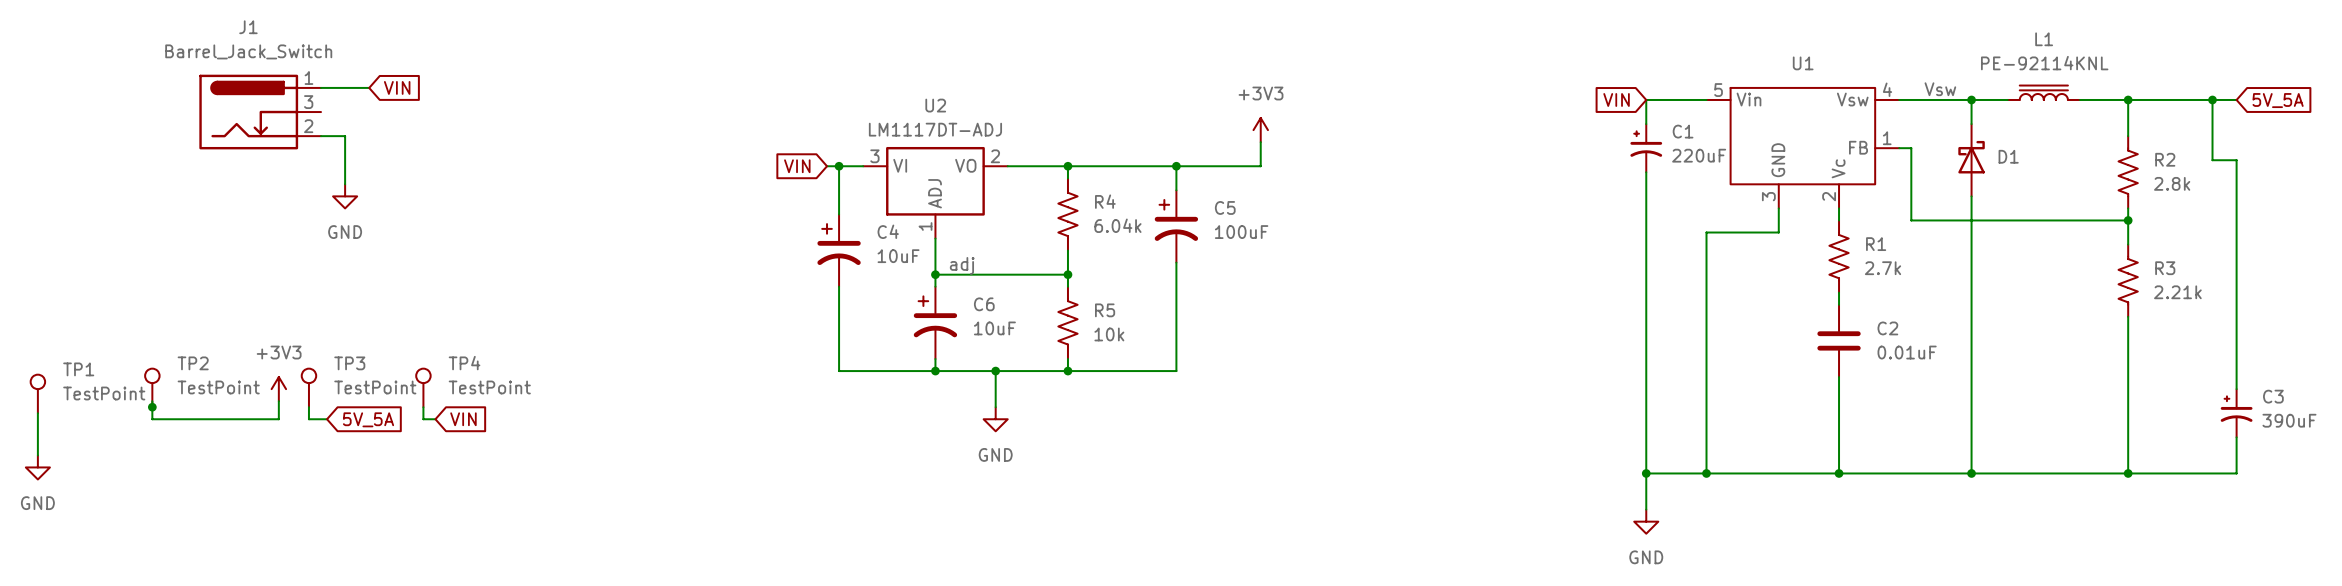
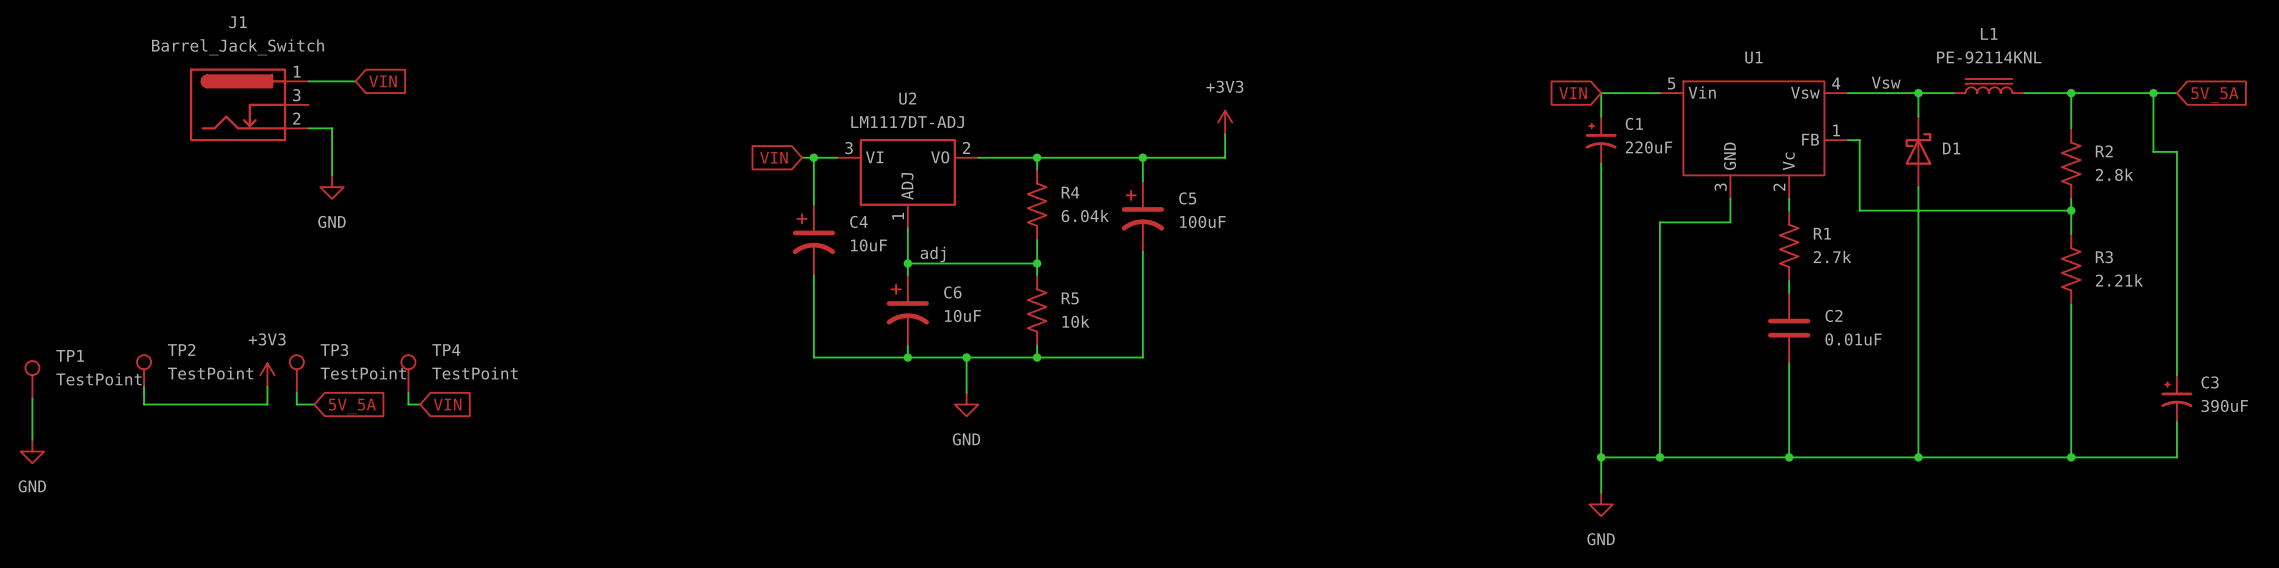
junction: (152, 407) -> none

